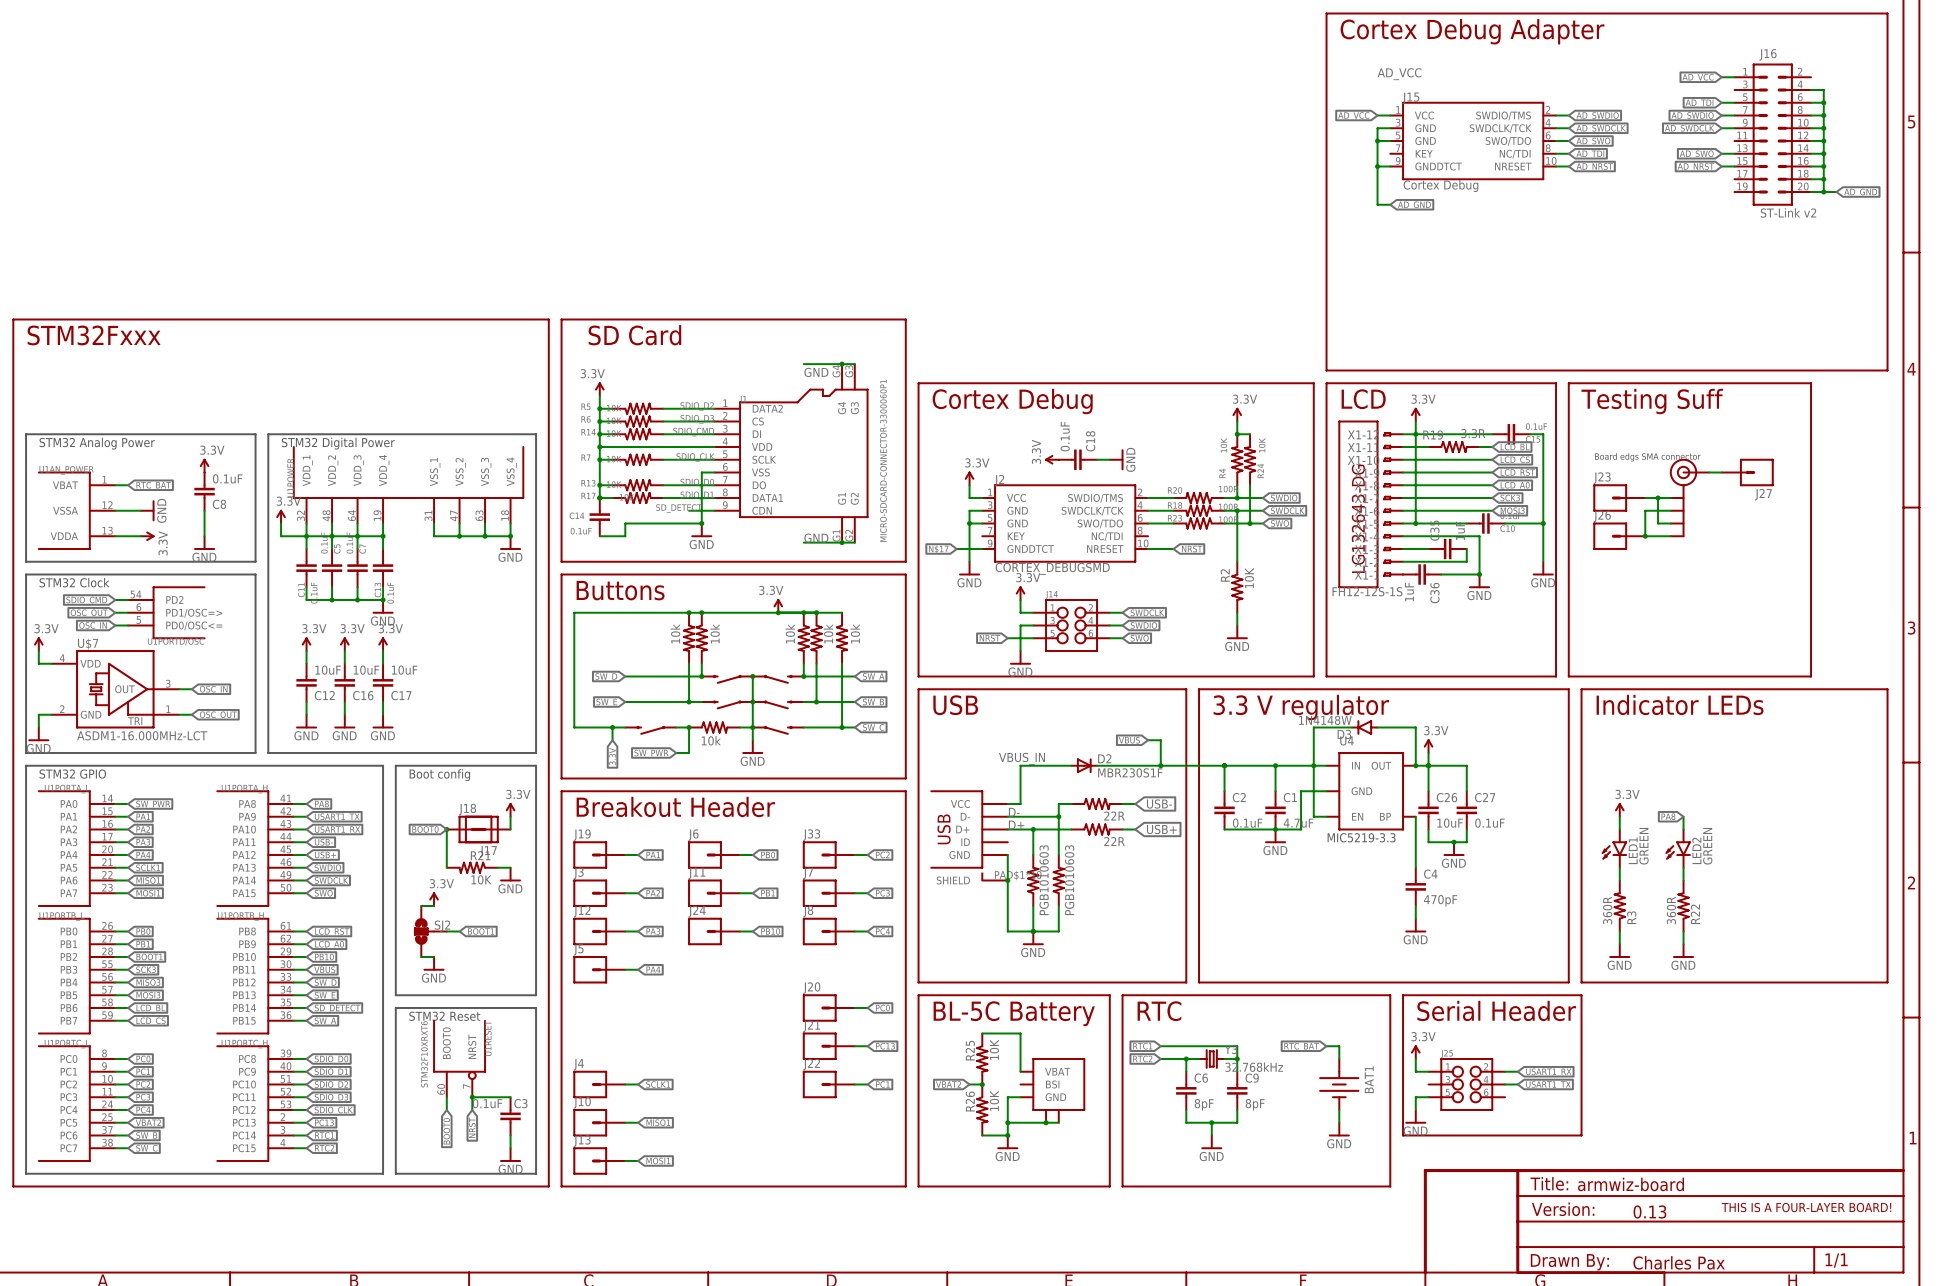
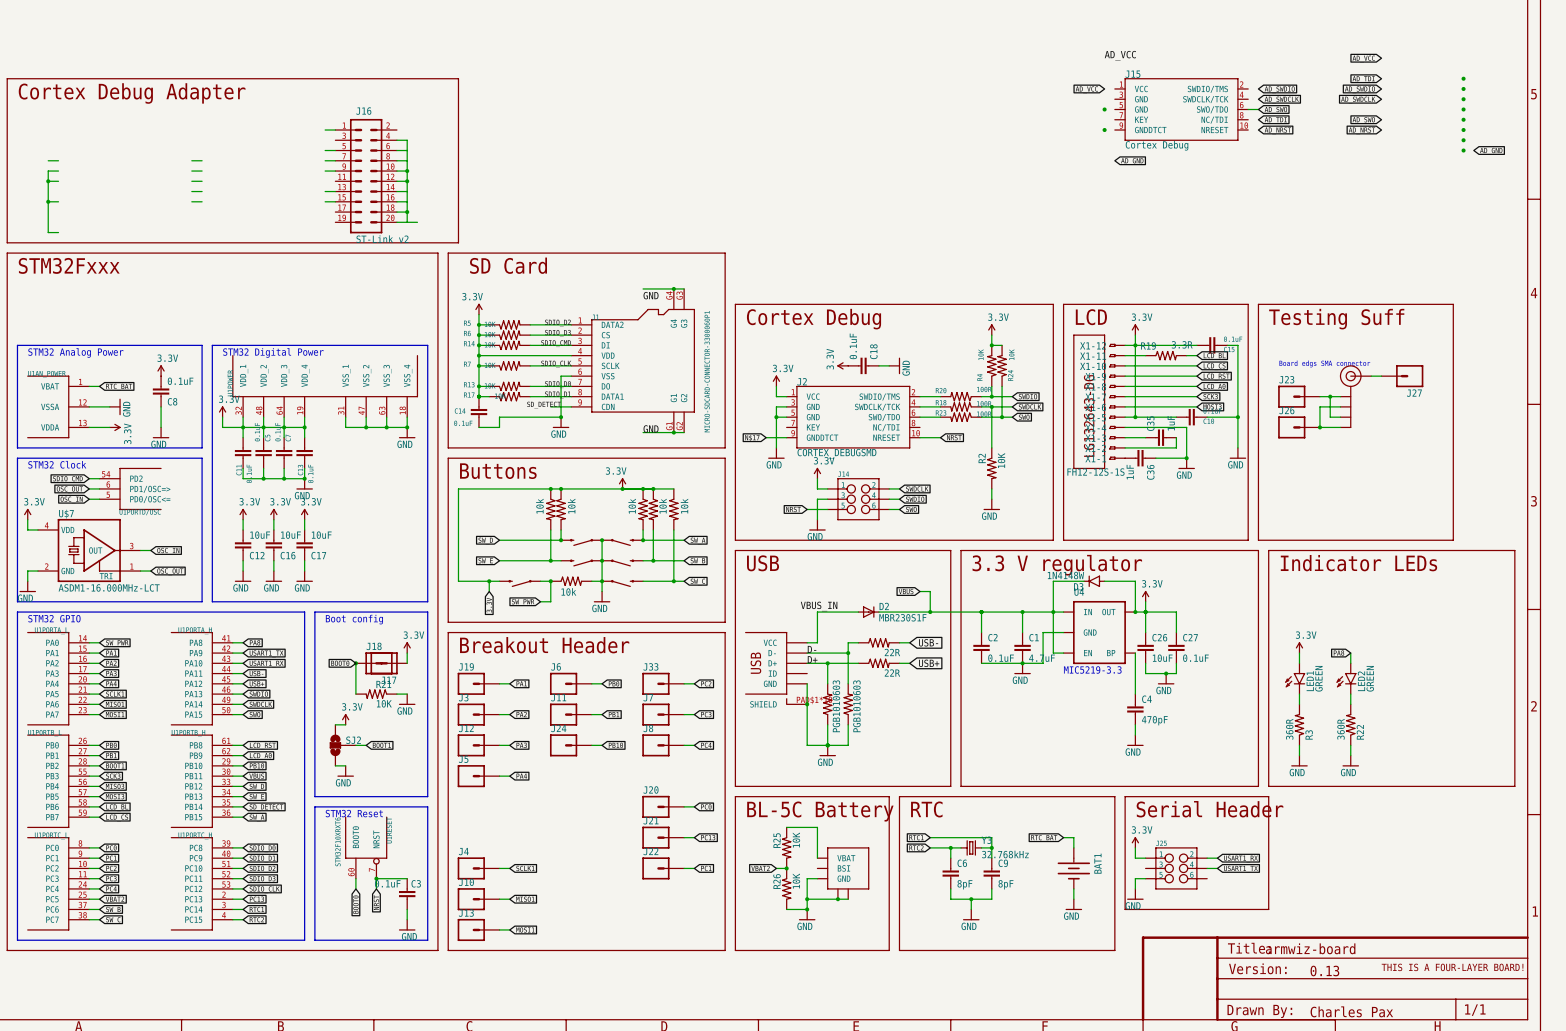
line: (1326, 13) (1326, 370) (1887, 370) (1887, 13) (1326, 13) -> none
text: Cortex Debug Adapter (1472, 31) -> none
wire: (1721, 77) (1734, 77) -> none
wire: (1811, 90) (1823, 90) (1823, 192) -> none
line: none -> (7, 78) (7, 242) (458, 242) (458, 78) (7, 78)
wire: (1721, 102) (1734, 102) -> none
wire: (1811, 102) (1823, 102) -> none
wire: (1377, 115) (1390, 115) -> none
wire: (1556, 115) (1568, 115) -> none
wire: (1721, 115) (1734, 115) -> none
wire: (1811, 115) (1823, 115) -> none
text: none -> Cortex Debug Adapter (132, 93)
wire: (1390, 128) (1377, 128) (1377, 204) (1390, 204) -> none
wire: (1556, 128) (1568, 128) -> none
wire: (1721, 128) (1734, 128) -> none
wire: (1811, 128) (1823, 128) -> none
J16 position: (1772, 134) -> (366, 176)
wire: (1377, 141) (1390, 141) -> none
wire: (1811, 141) (1823, 141) -> none
wire: (1556, 153) (1568, 153) -> none
wire: (1721, 153) (1734, 153) -> none
wire: (1811, 153) (1823, 153) -> none
wire: none -> (325, 130) (335, 130)
wire: (1377, 166) (1390, 166) -> none
wire: (1556, 166) (1568, 166) -> none
wire: (1721, 166) (1734, 166) -> none
wire: (1811, 166) (1823, 166) -> none
wire: none -> (396, 140) (407, 140) (407, 222)
wire: (1811, 179) (1823, 179) -> none
wire: none -> (325, 150) (335, 150)
wire: none -> (396, 150) (407, 150)
wire: (1811, 192) (1836, 192) -> none
wire: none -> (48, 160) (58, 160)
wire: none -> (191, 160) (202, 160)
wire: none -> (325, 160) (335, 160)
wire: none -> (396, 160) (407, 160)
wire: none -> (58, 171) (48, 171) (48, 232) (58, 232)
wire: none -> (191, 171) (202, 171)
wire: none -> (325, 171) (335, 171)
wire: none -> (396, 171) (407, 171)
junction: none -> (407, 171)
wire: none -> (48, 181) (58, 181)
junction: none -> (48, 181)
wire: none -> (191, 181) (202, 181)
wire: none -> (396, 181) (407, 181)
junction: none -> (407, 181)
wire: none -> (191, 191) (202, 191)
wire: none -> (325, 191) (335, 191)
wire: none -> (396, 191) (407, 191)
wire: none -> (48, 201) (58, 201)
junction: none -> (48, 201)
wire: none -> (191, 201) (202, 201)
wire: none -> (325, 201) (335, 201)
wire: none -> (396, 201) (407, 201)
wire: none -> (396, 212) (407, 212)
junction: none -> (407, 212)
wire: none -> (396, 222) (417, 222)

